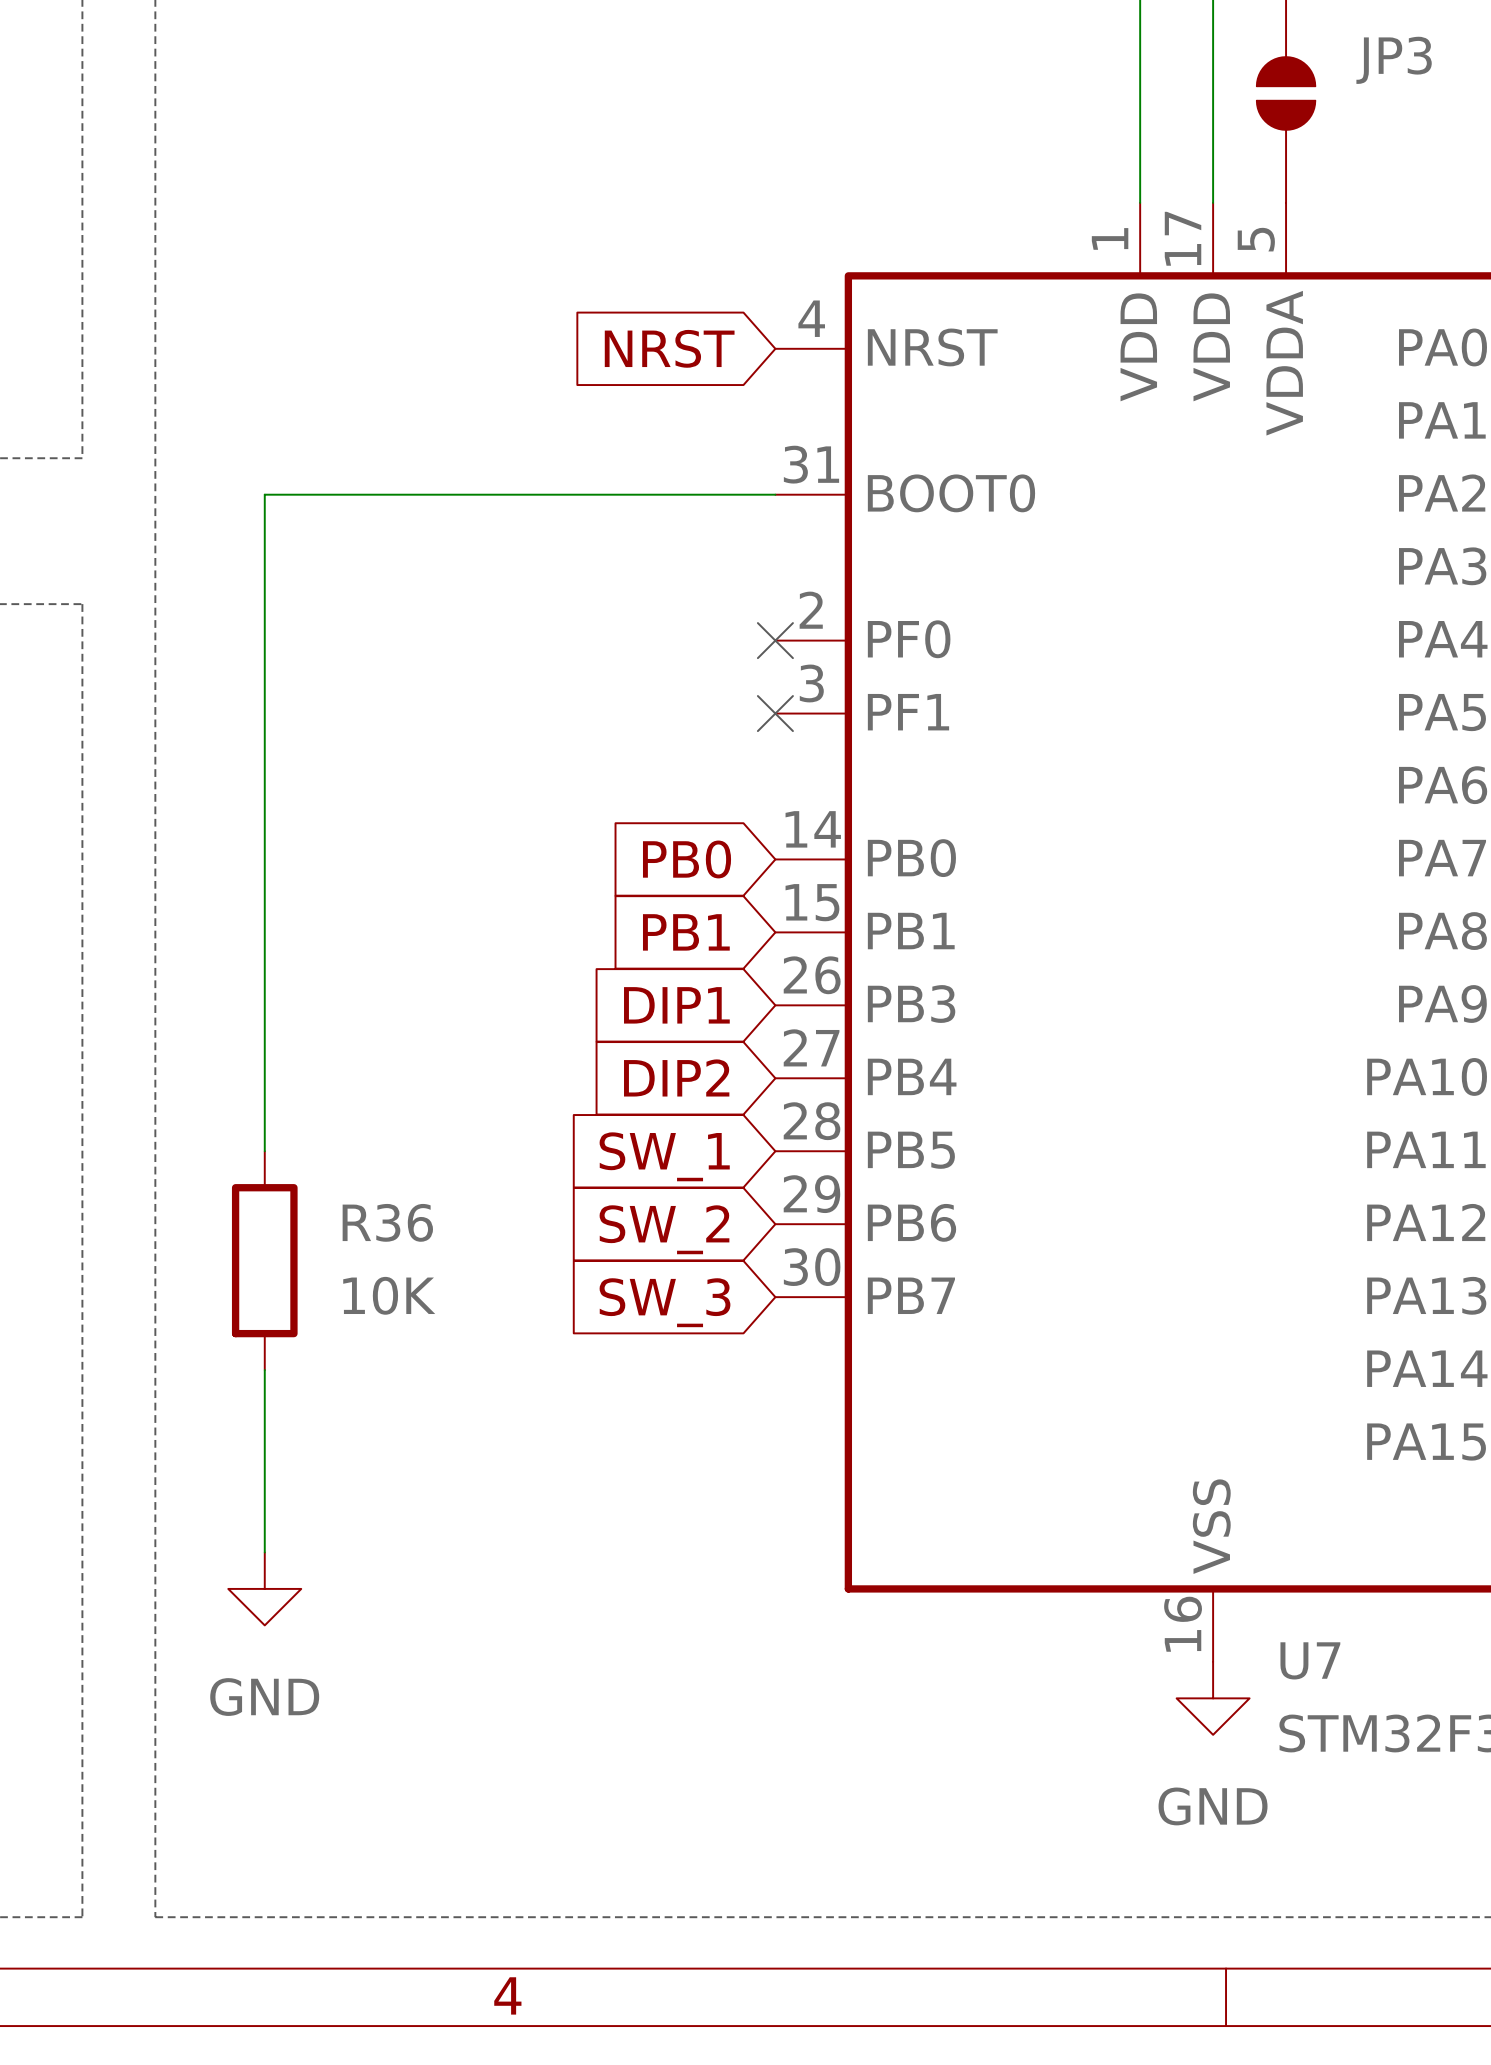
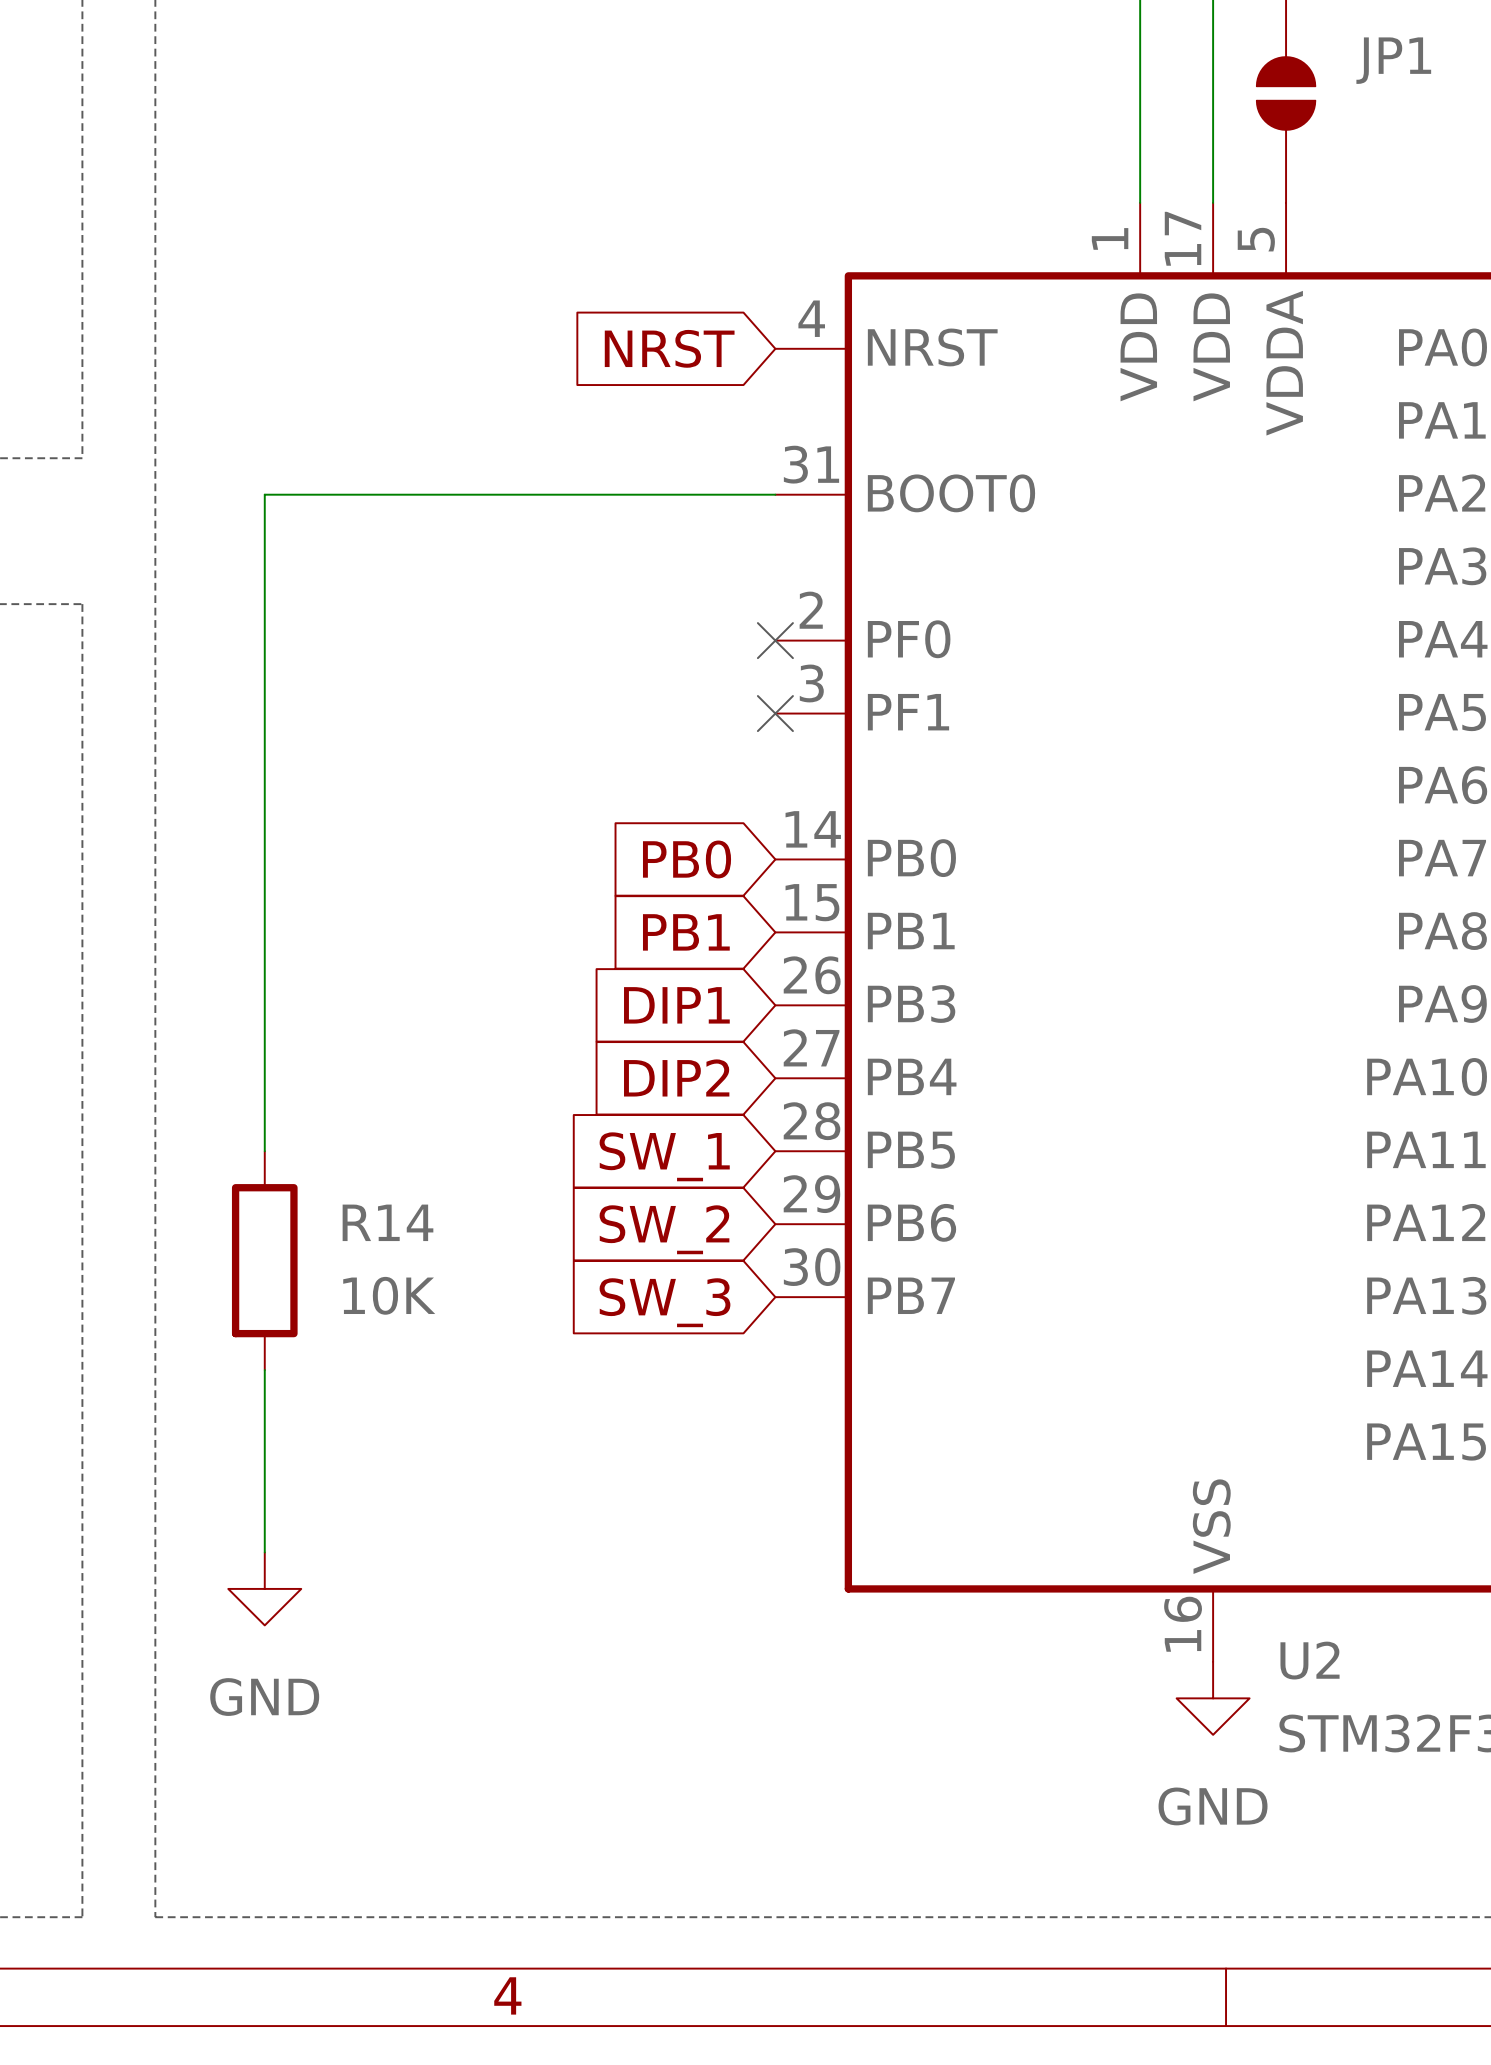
JP3 name: JP3 (1394, 60) -> JP1 (1393, 60)
R36 name: R36 (387, 1222) -> R14 (387, 1222)
U7 name: U7 (1310, 1660) -> U2 (1310, 1660)

